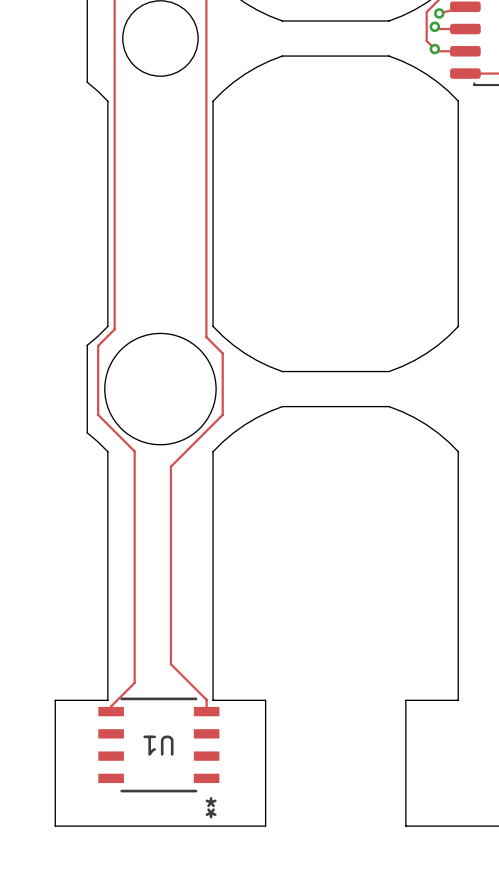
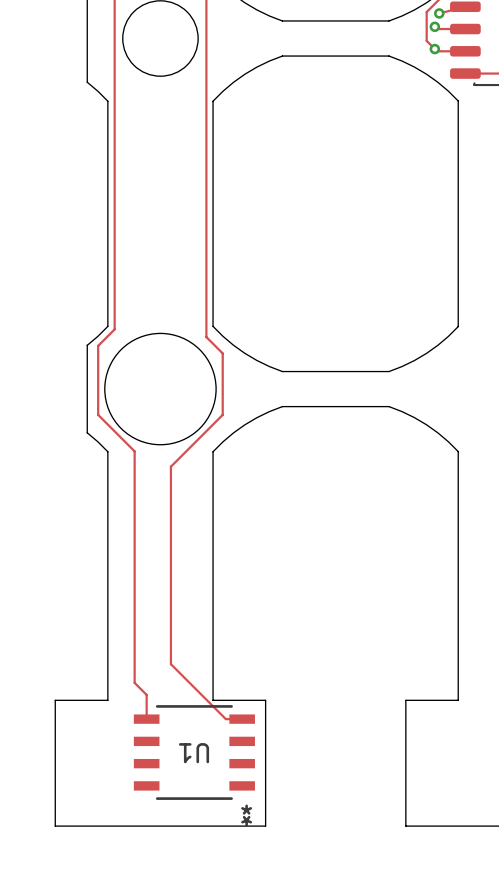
track: (134, 682) (111, 706) (111, 711) -> (134, 682) (146, 694) (146, 719)
track: (206, 699) (206, 711) -> (206, 699) (225, 719) (242, 719)
U1 position: (158, 744) -> (194, 752)

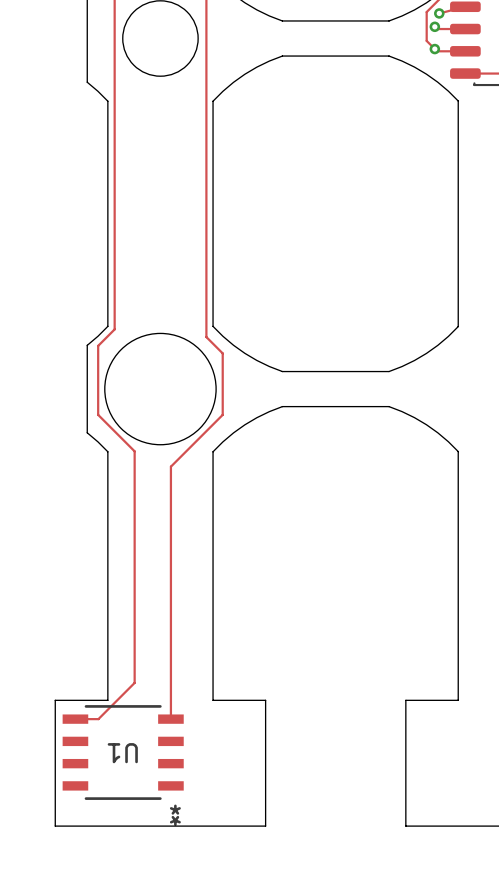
track: (170, 664) (225, 719) (242, 719) -> (170, 664) (170, 719)
track: (134, 682) (146, 694) (146, 719) -> (134, 682) (98, 719) (75, 719)
U1 position: (194, 752) -> (123, 752)

